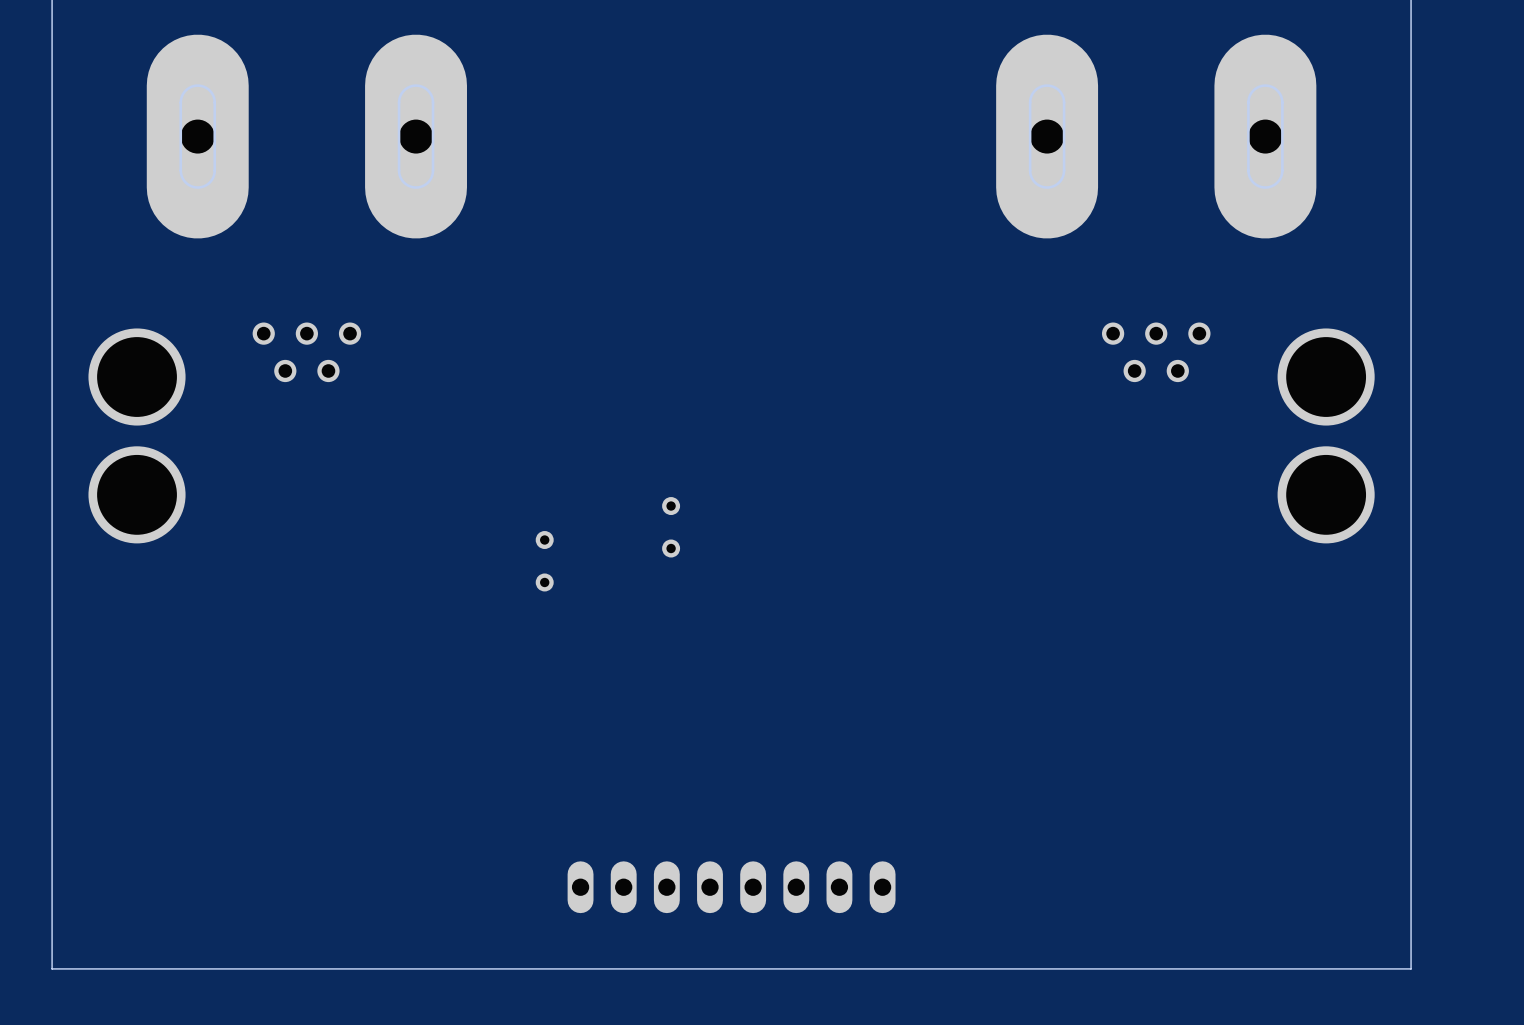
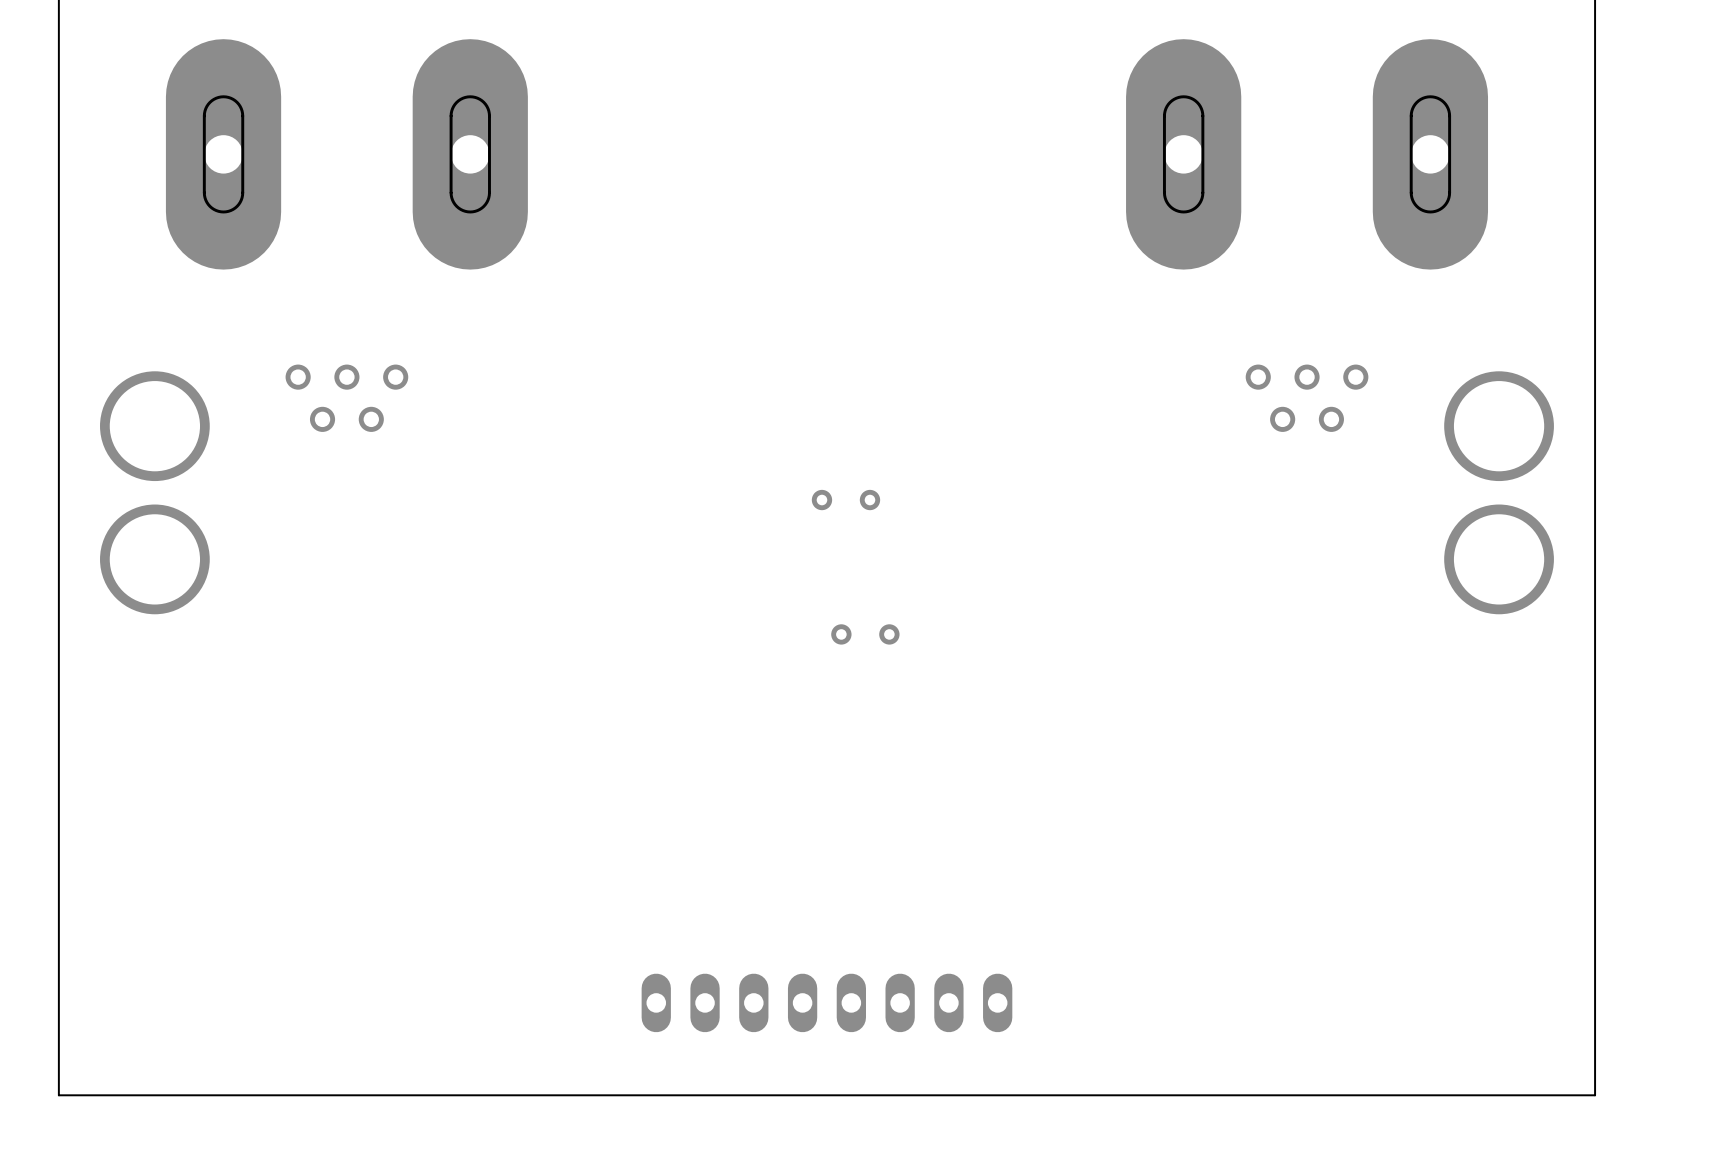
part: none -> (845, 500)
part: (671, 527) -> none
part: (544, 561) -> none
part: none -> (865, 634)

